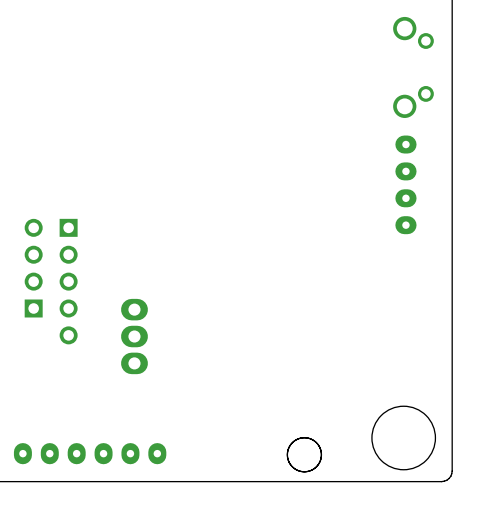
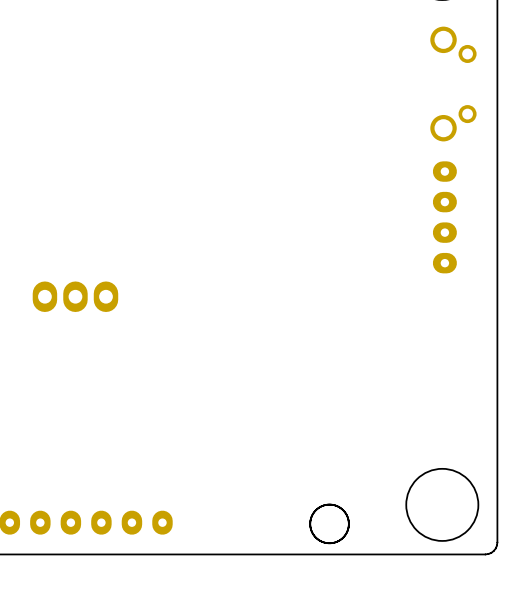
part: (33, 268) -> none
part: (68, 281) -> none
part rotation: 0° (134, 336) -> 90° clockwise (75, 296)
part position: (134, 336) -> (75, 296)

